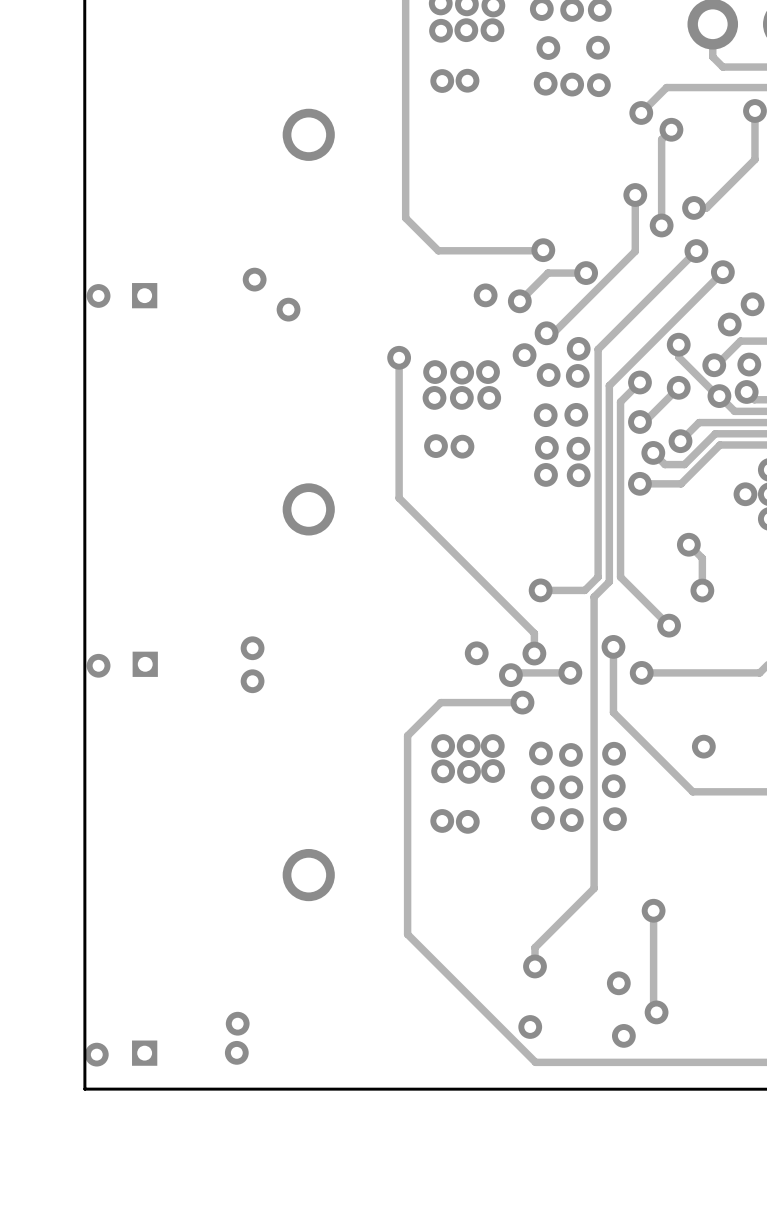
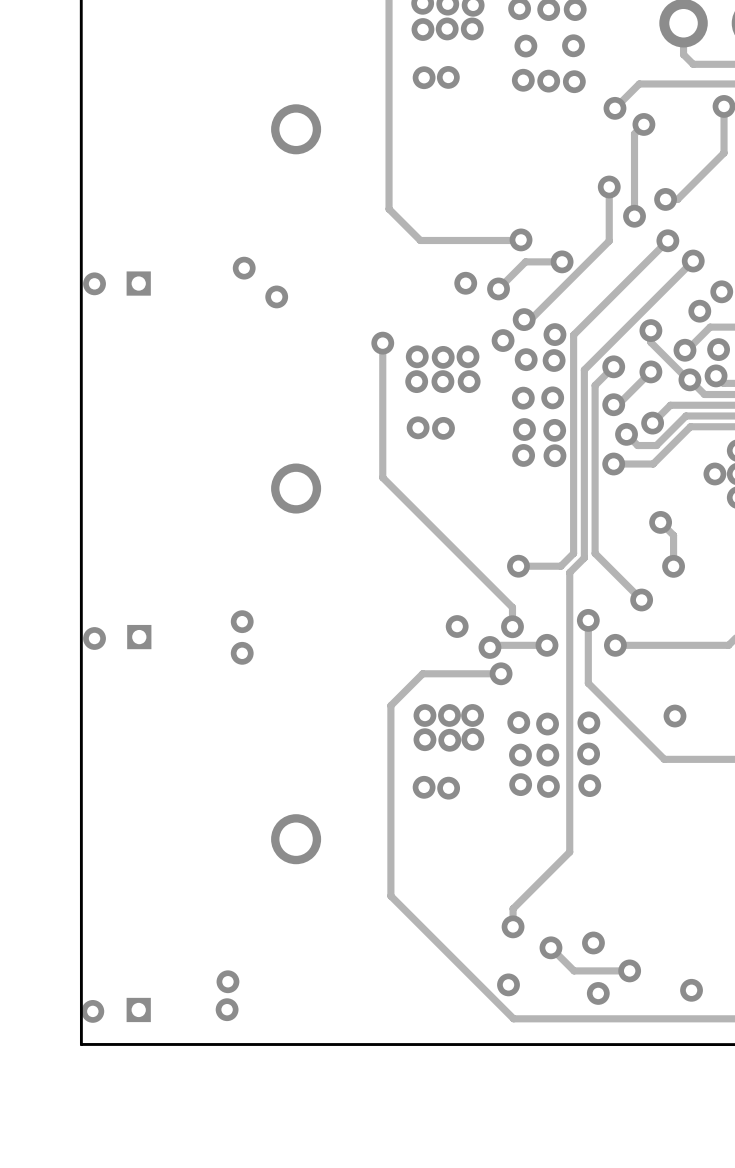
track: (653, 910) (653, 1009) -> none
via: (653, 910) -> none
track: none -> (550, 947) (574, 970) (629, 970)
via: none -> (550, 947)
via: none -> (691, 990)

